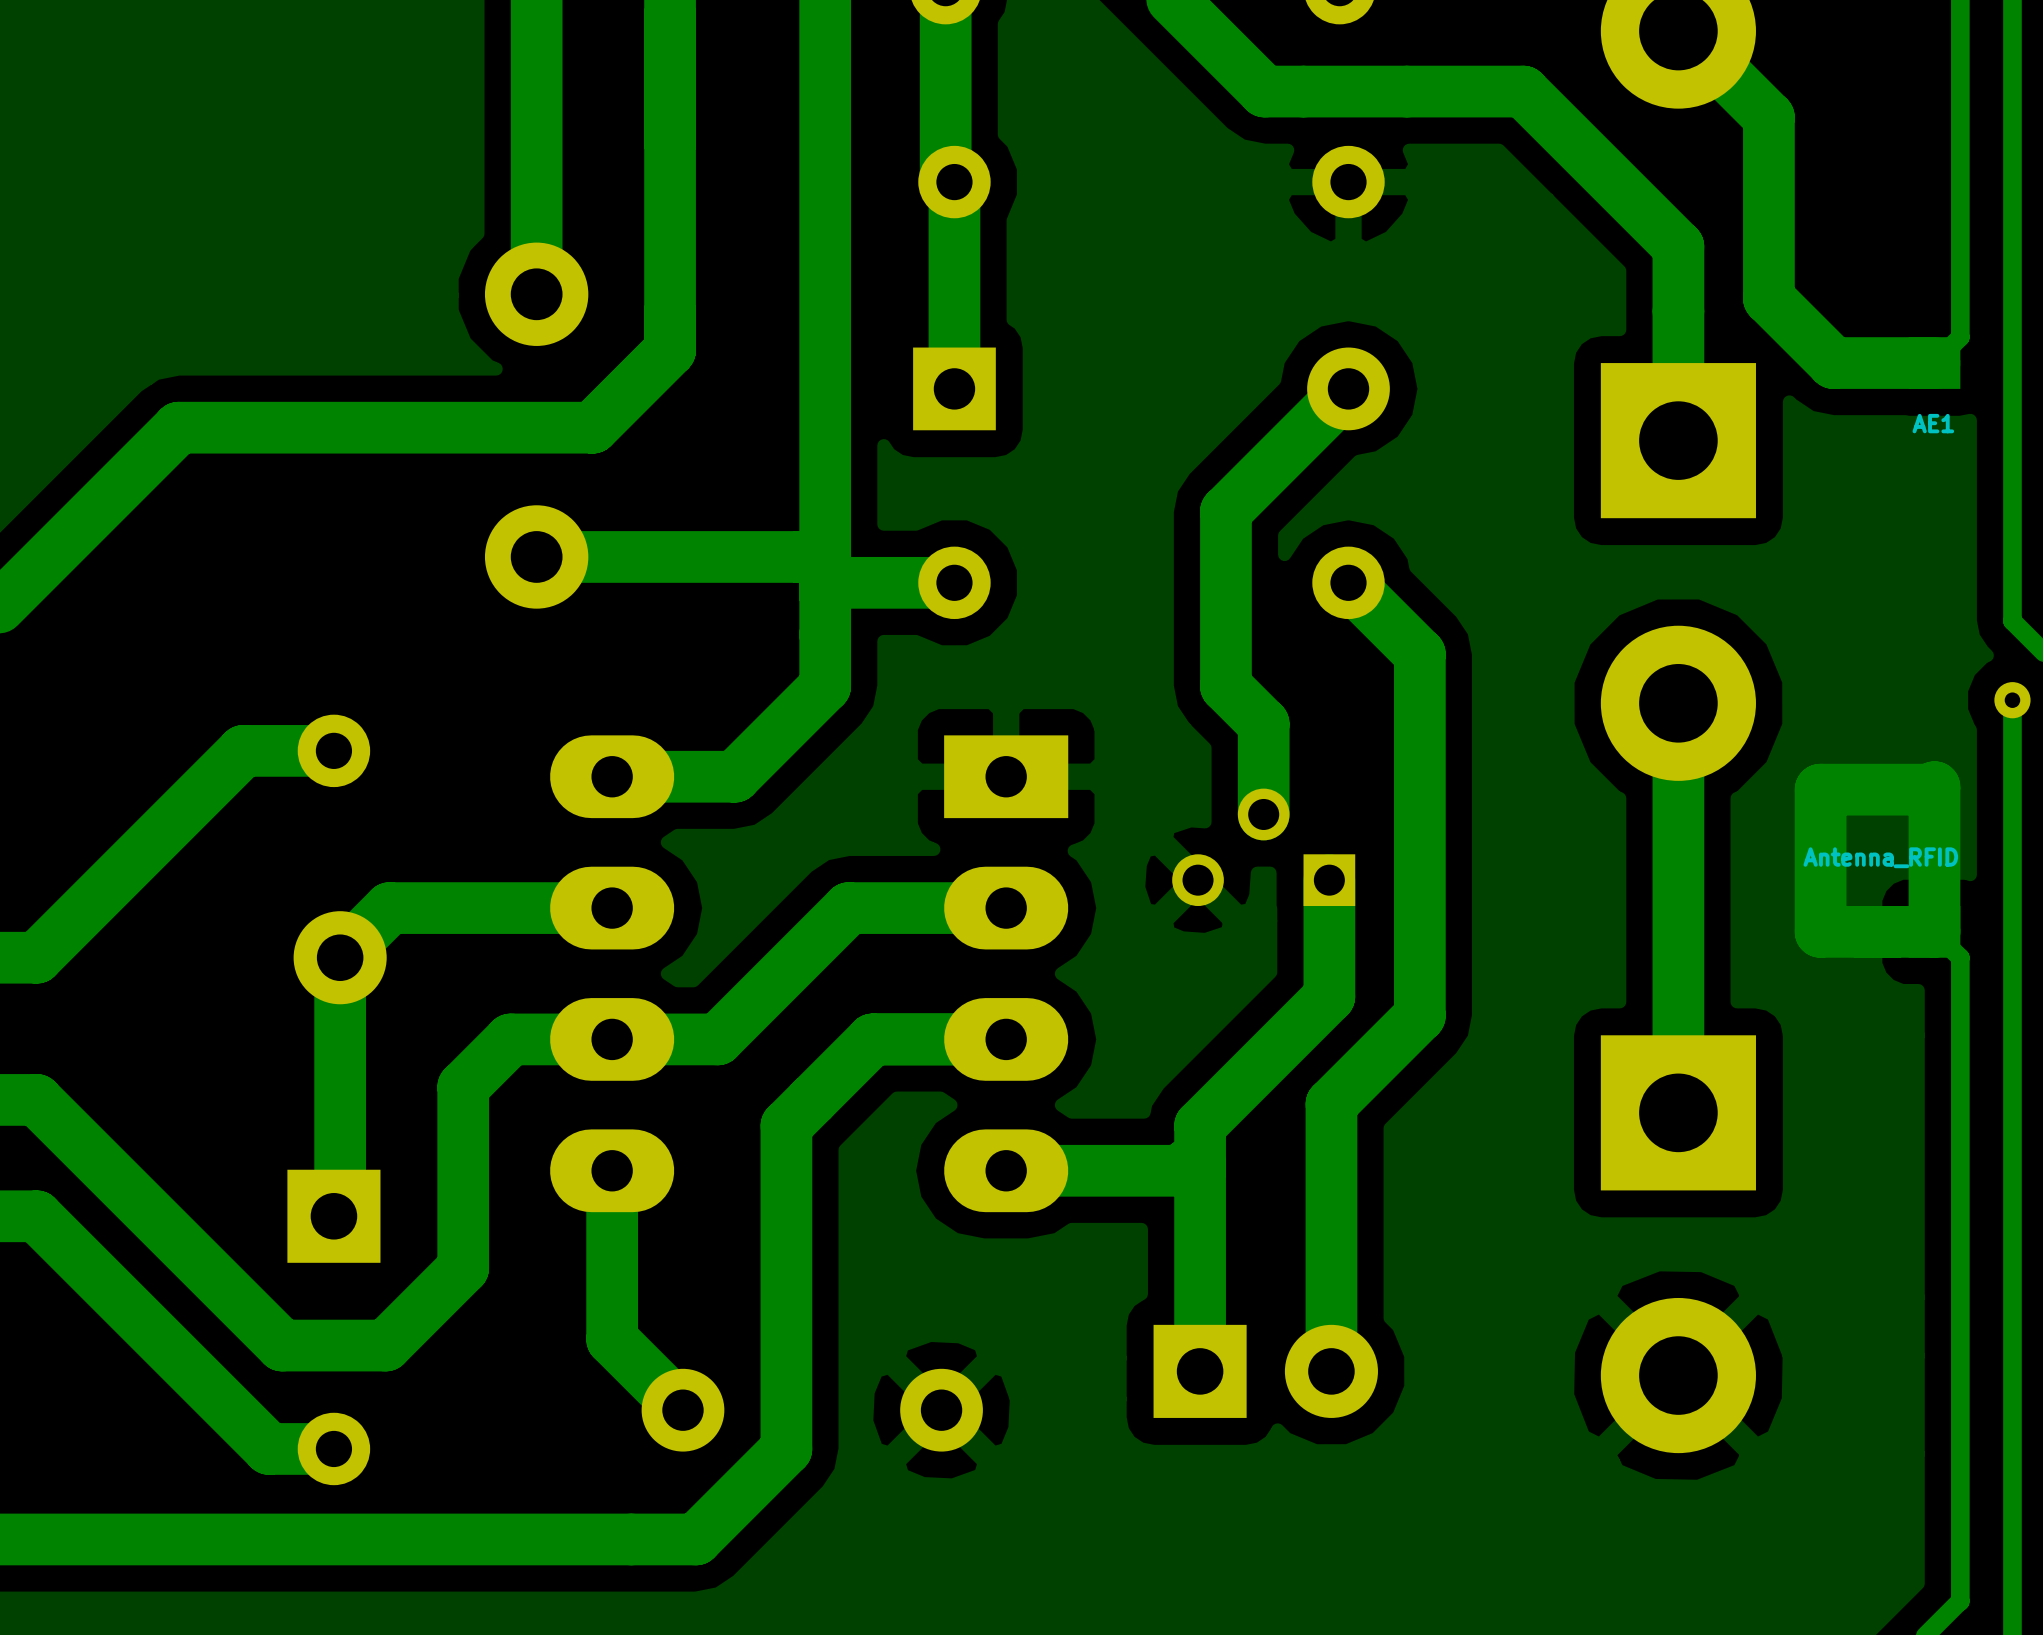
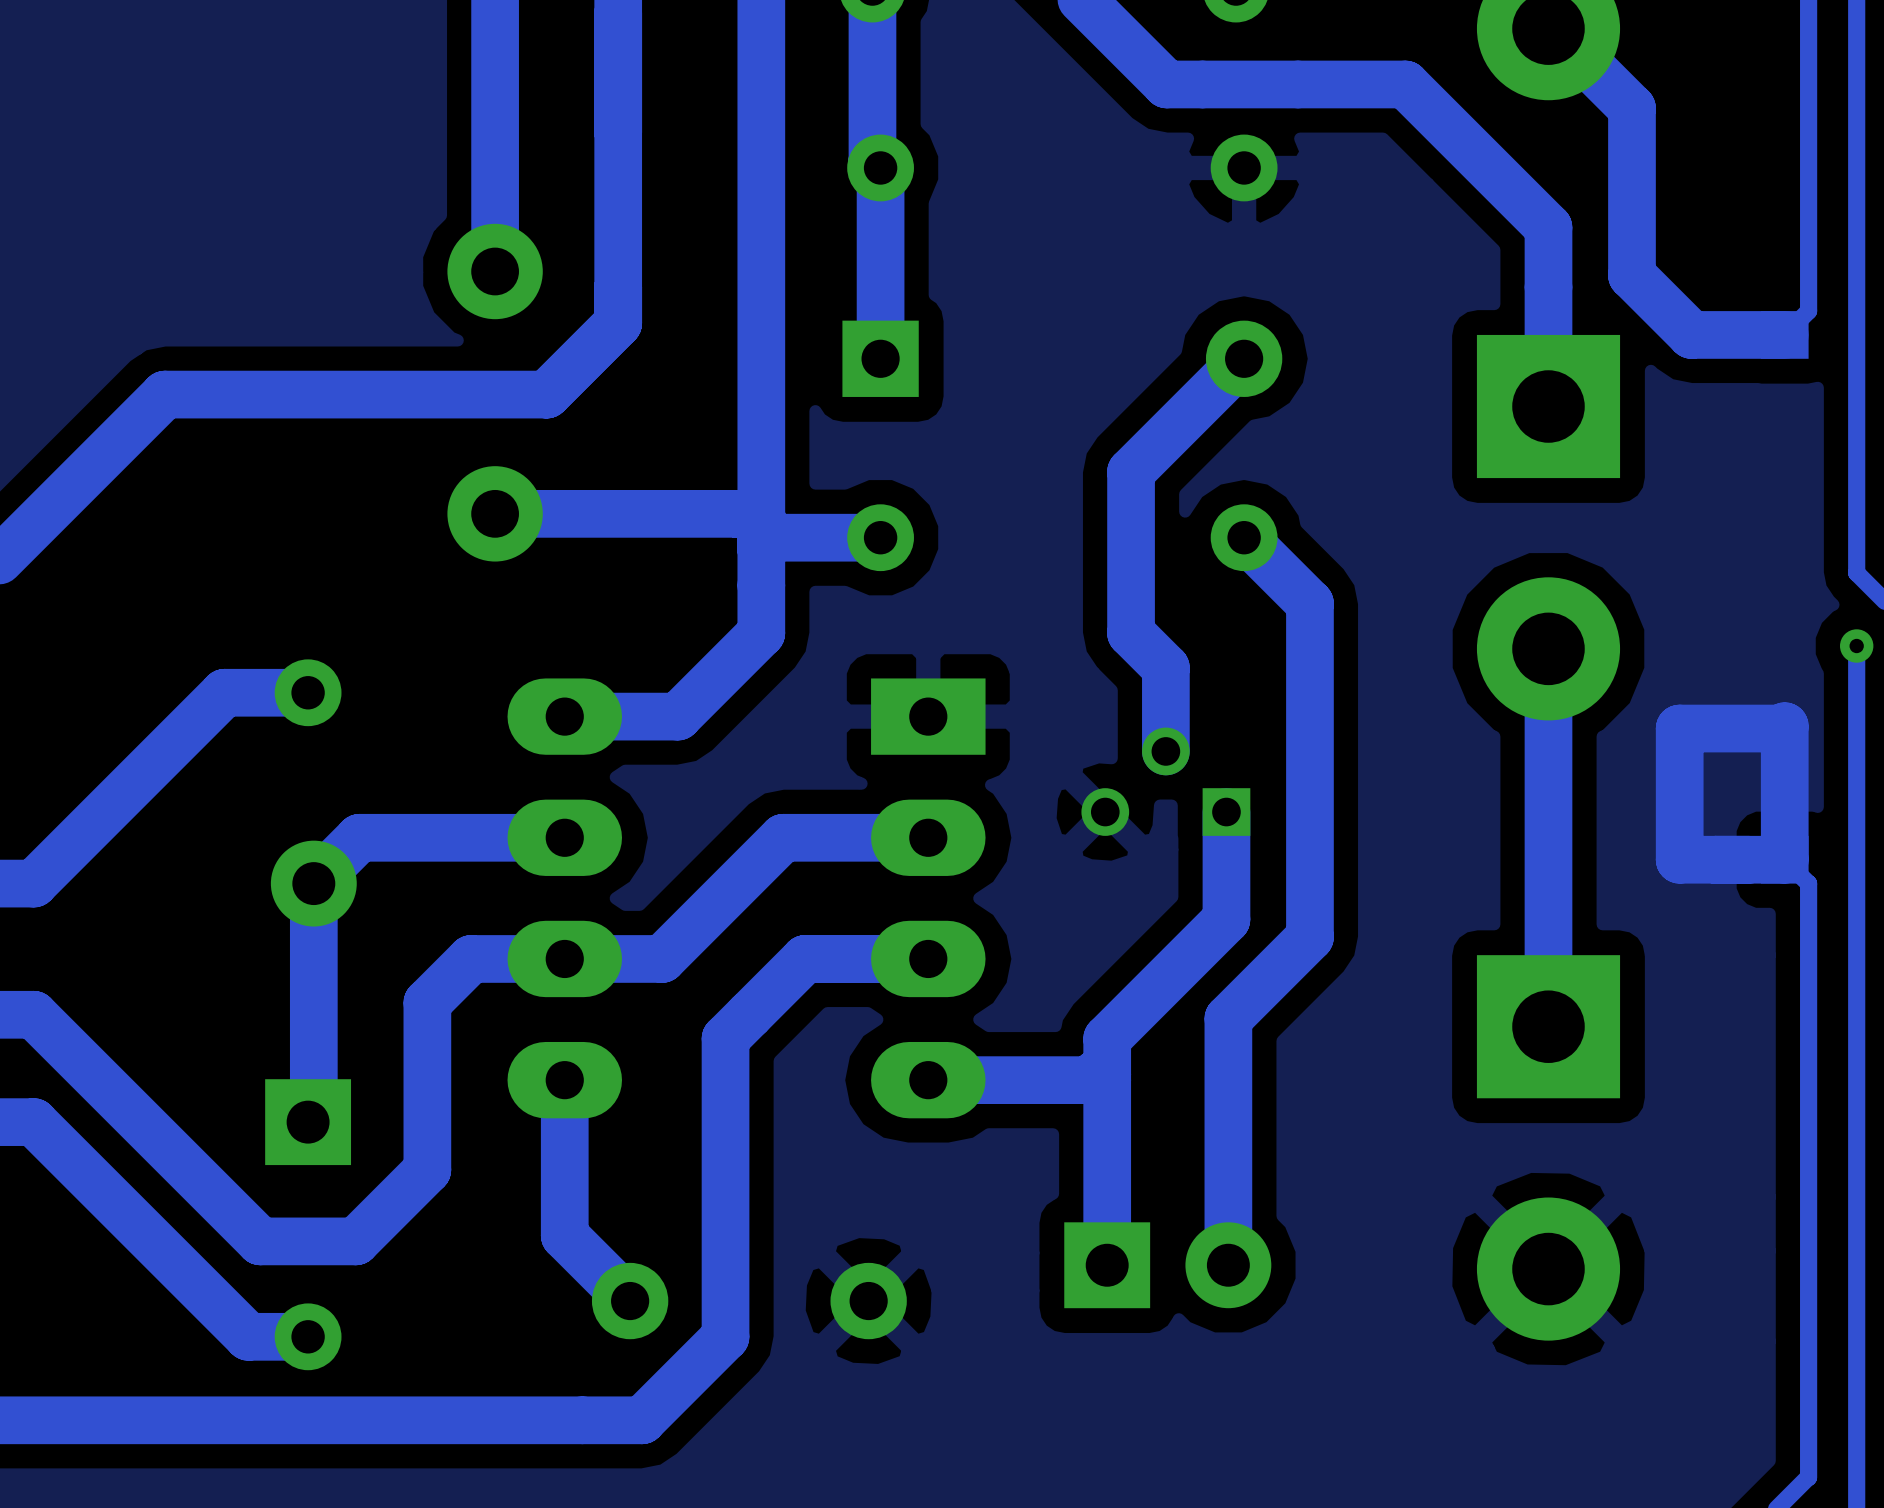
AE1 name: AE1 (1933, 423) -> none
AE1 value: Antenna_RFID (1880, 857) -> none

